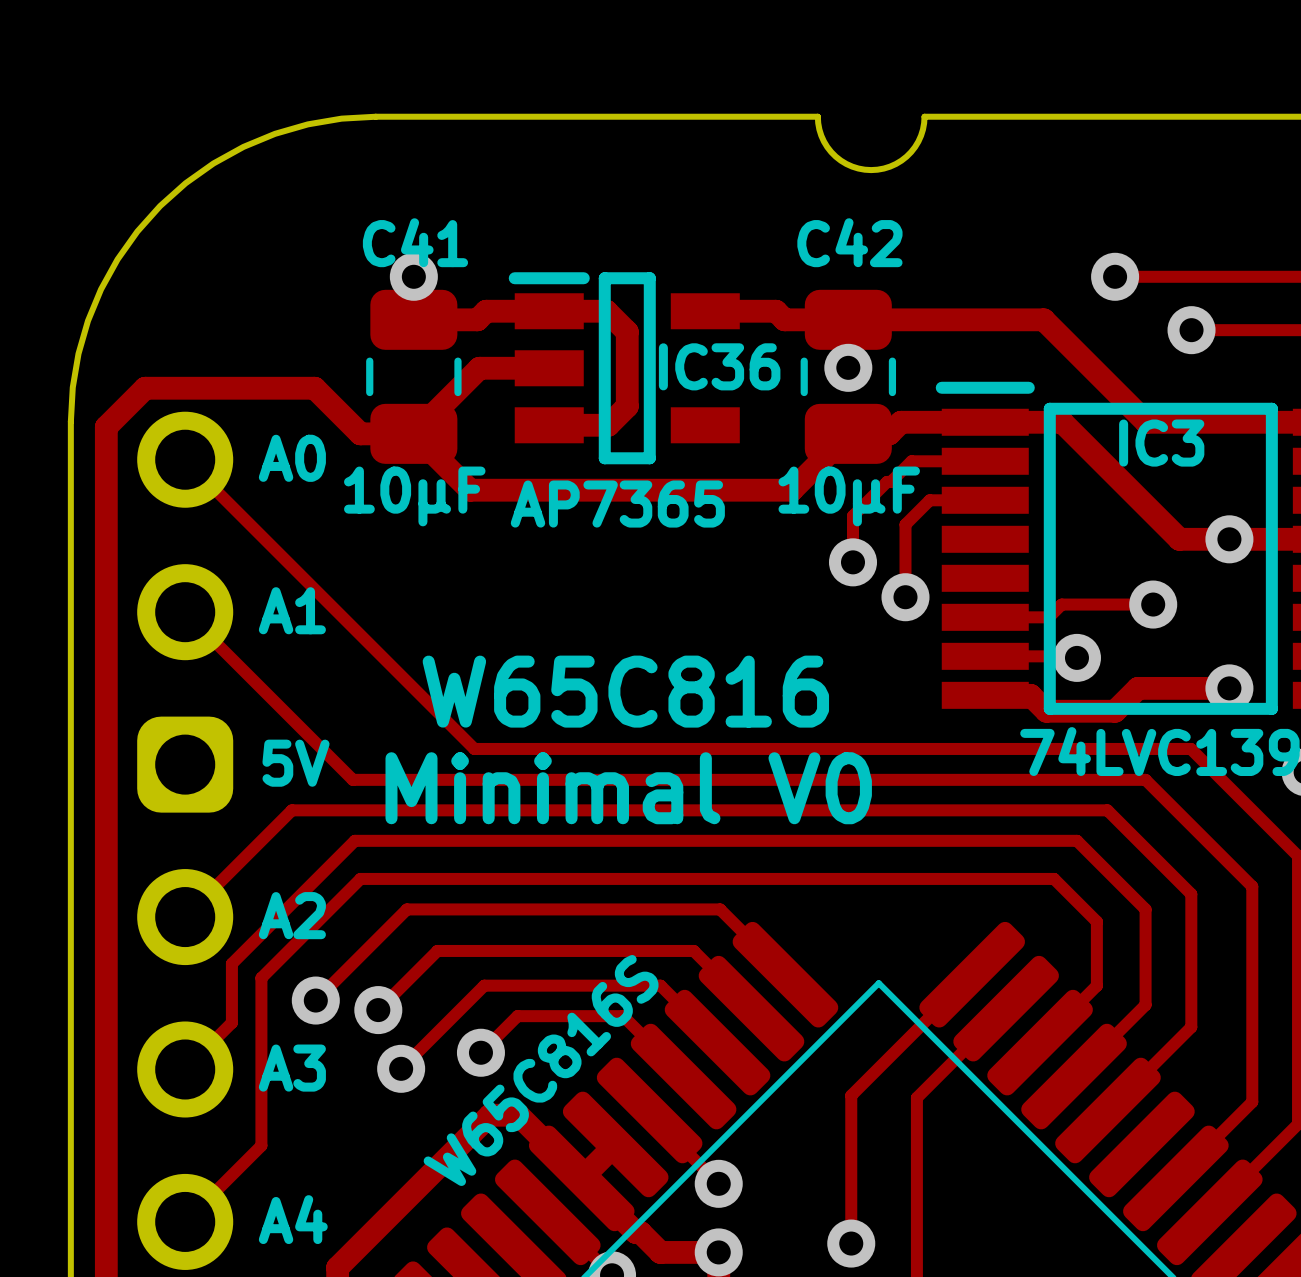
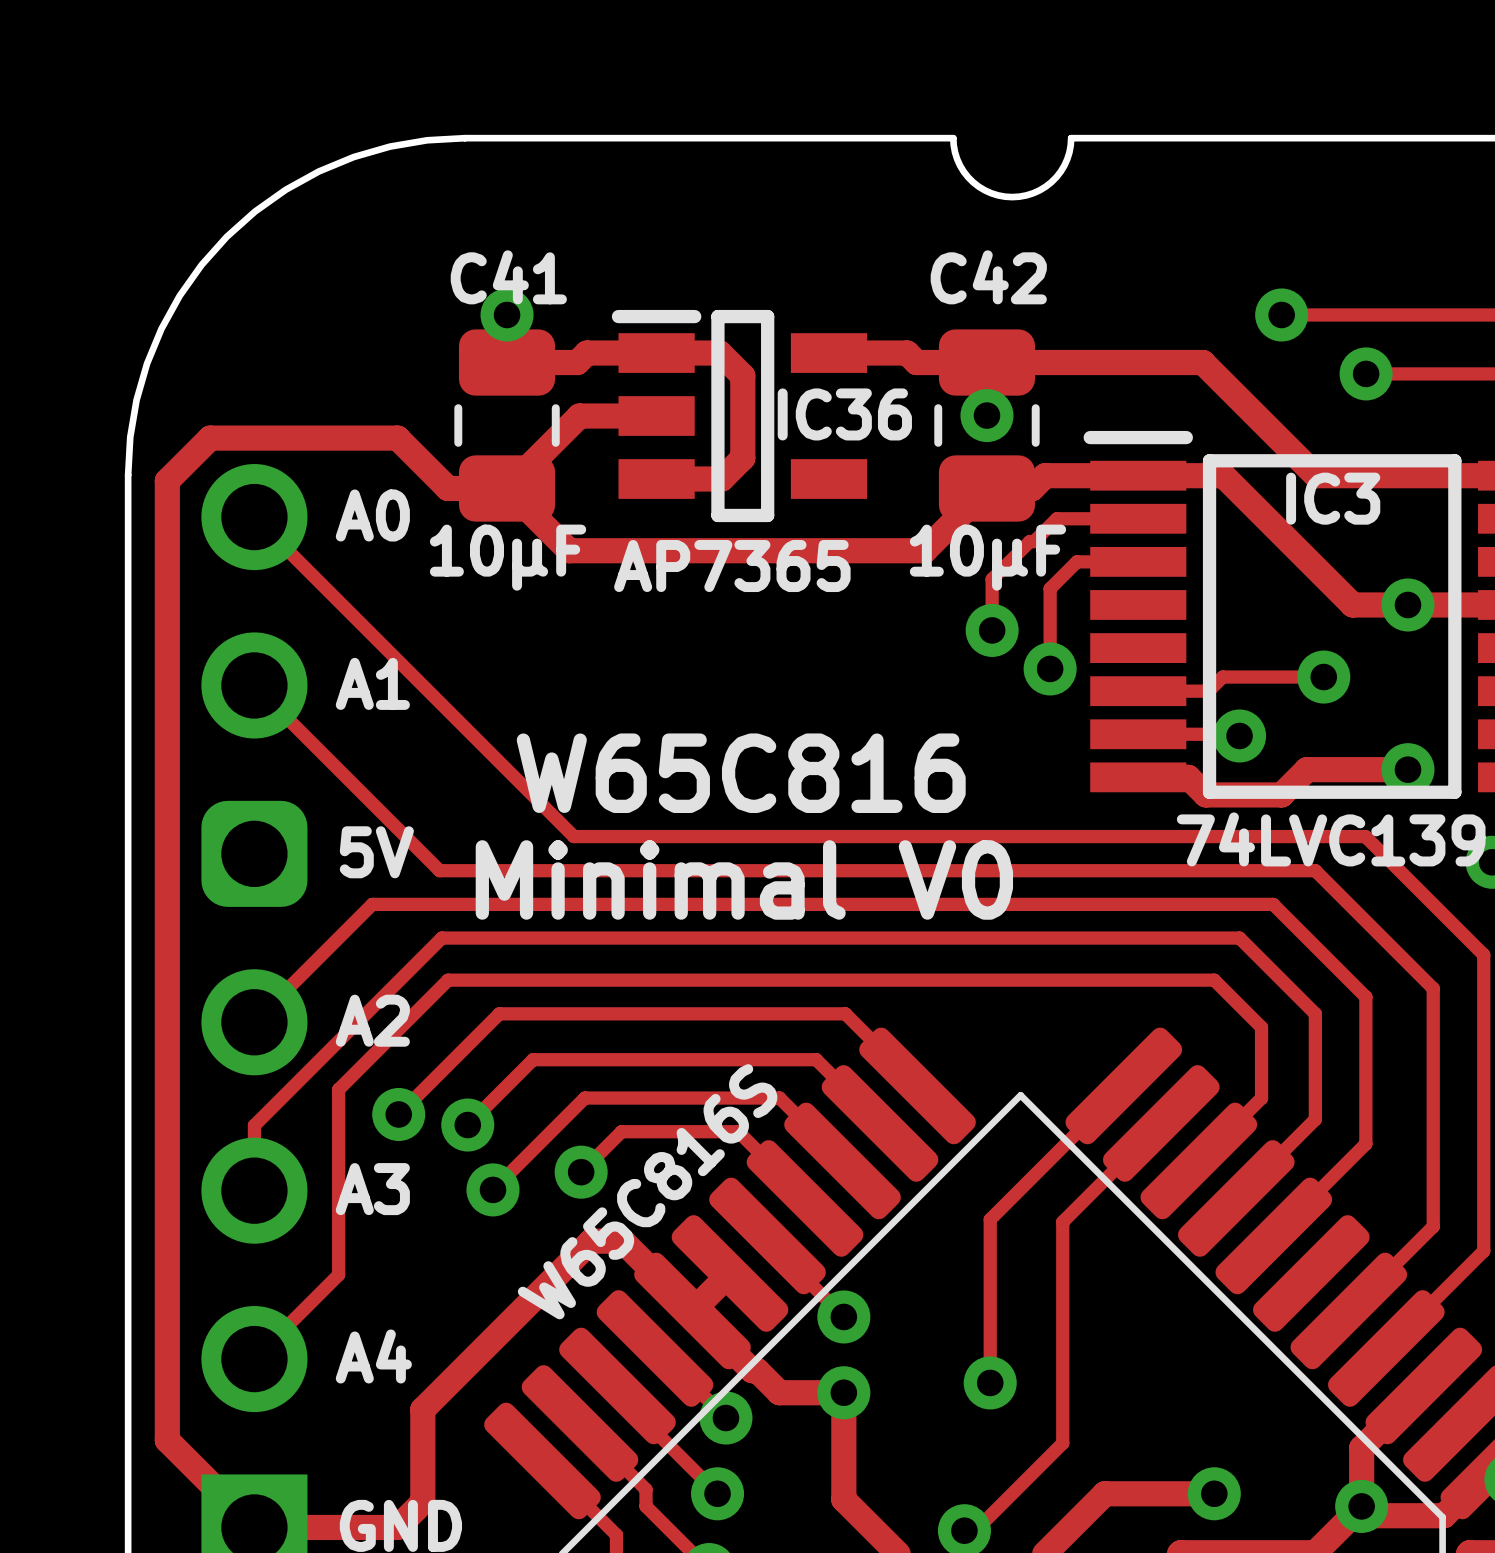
track: (231, 963) (231, 1022) (185, 1069) -> (306, 1073) (254, 1125) (254, 1190)

